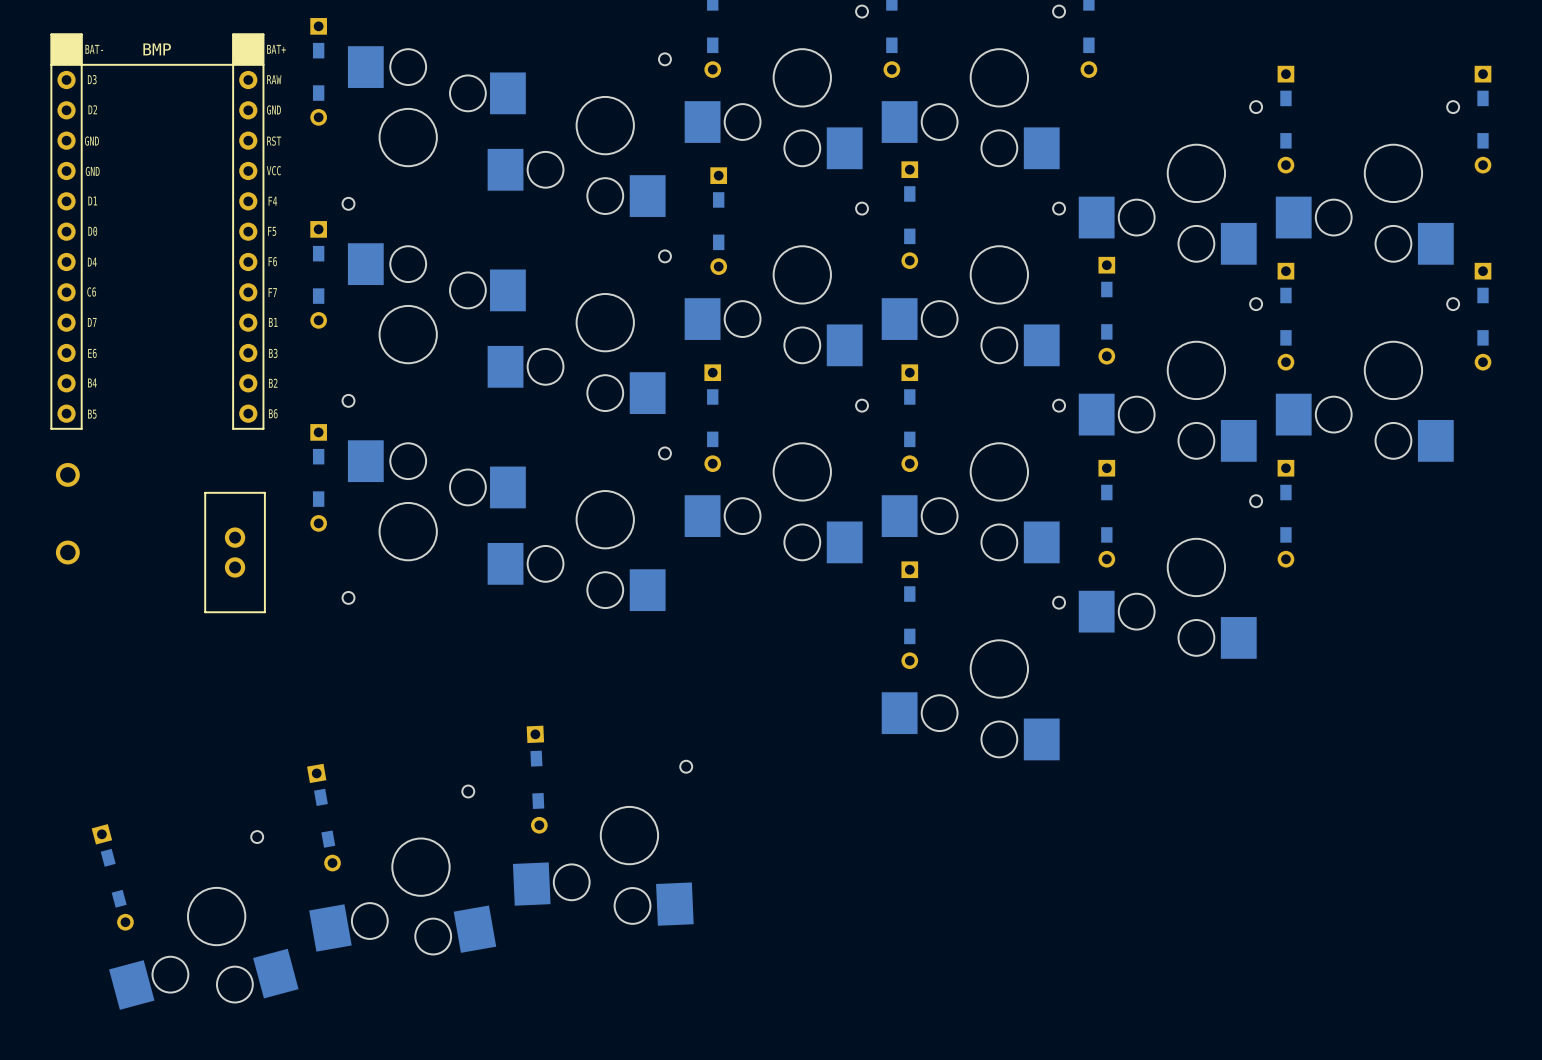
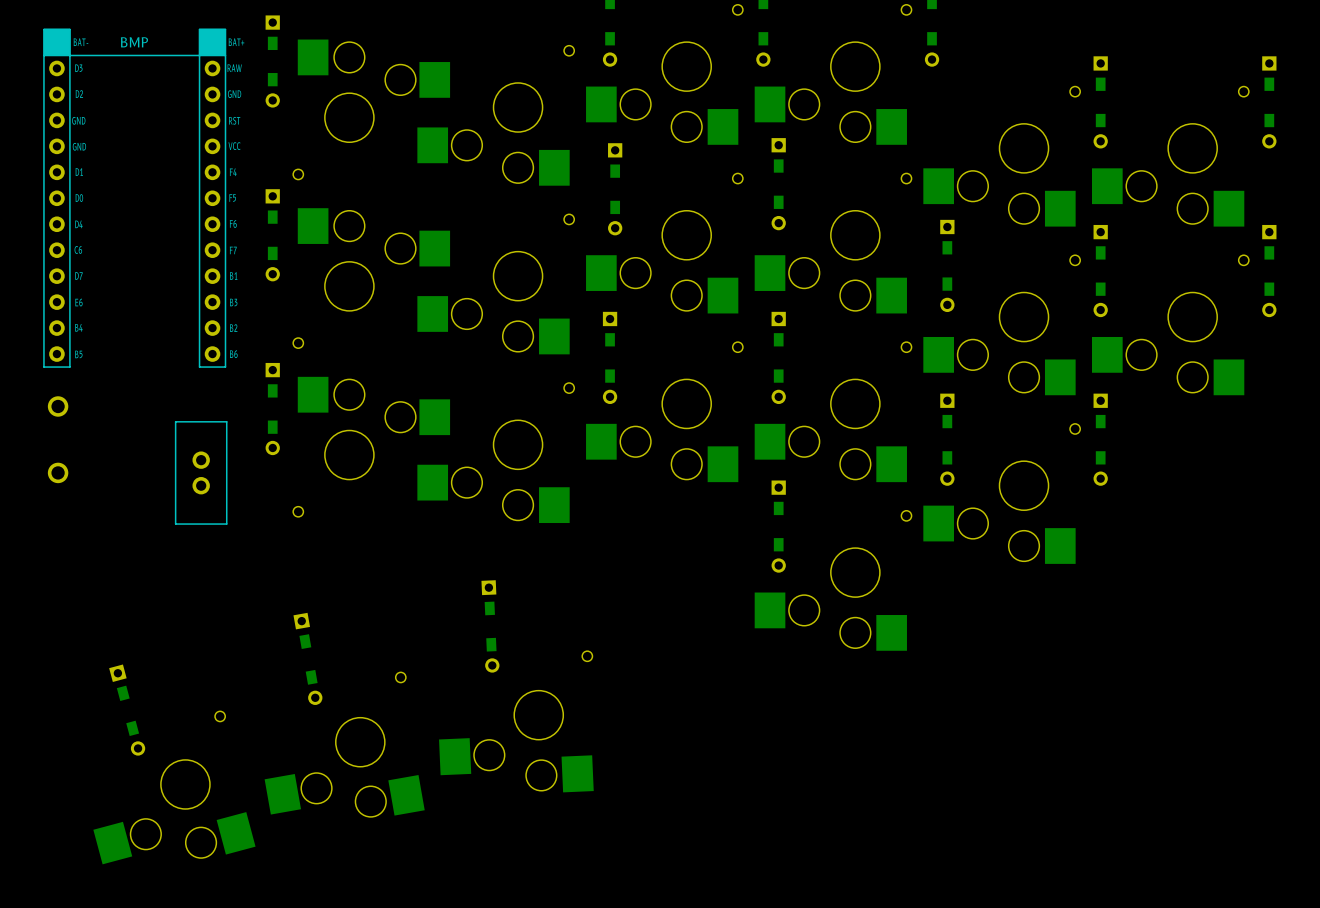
part position: (537, 779) -> (490, 626)
part position: (323, 817) -> (307, 658)
part position: (112, 877) -> (127, 710)

